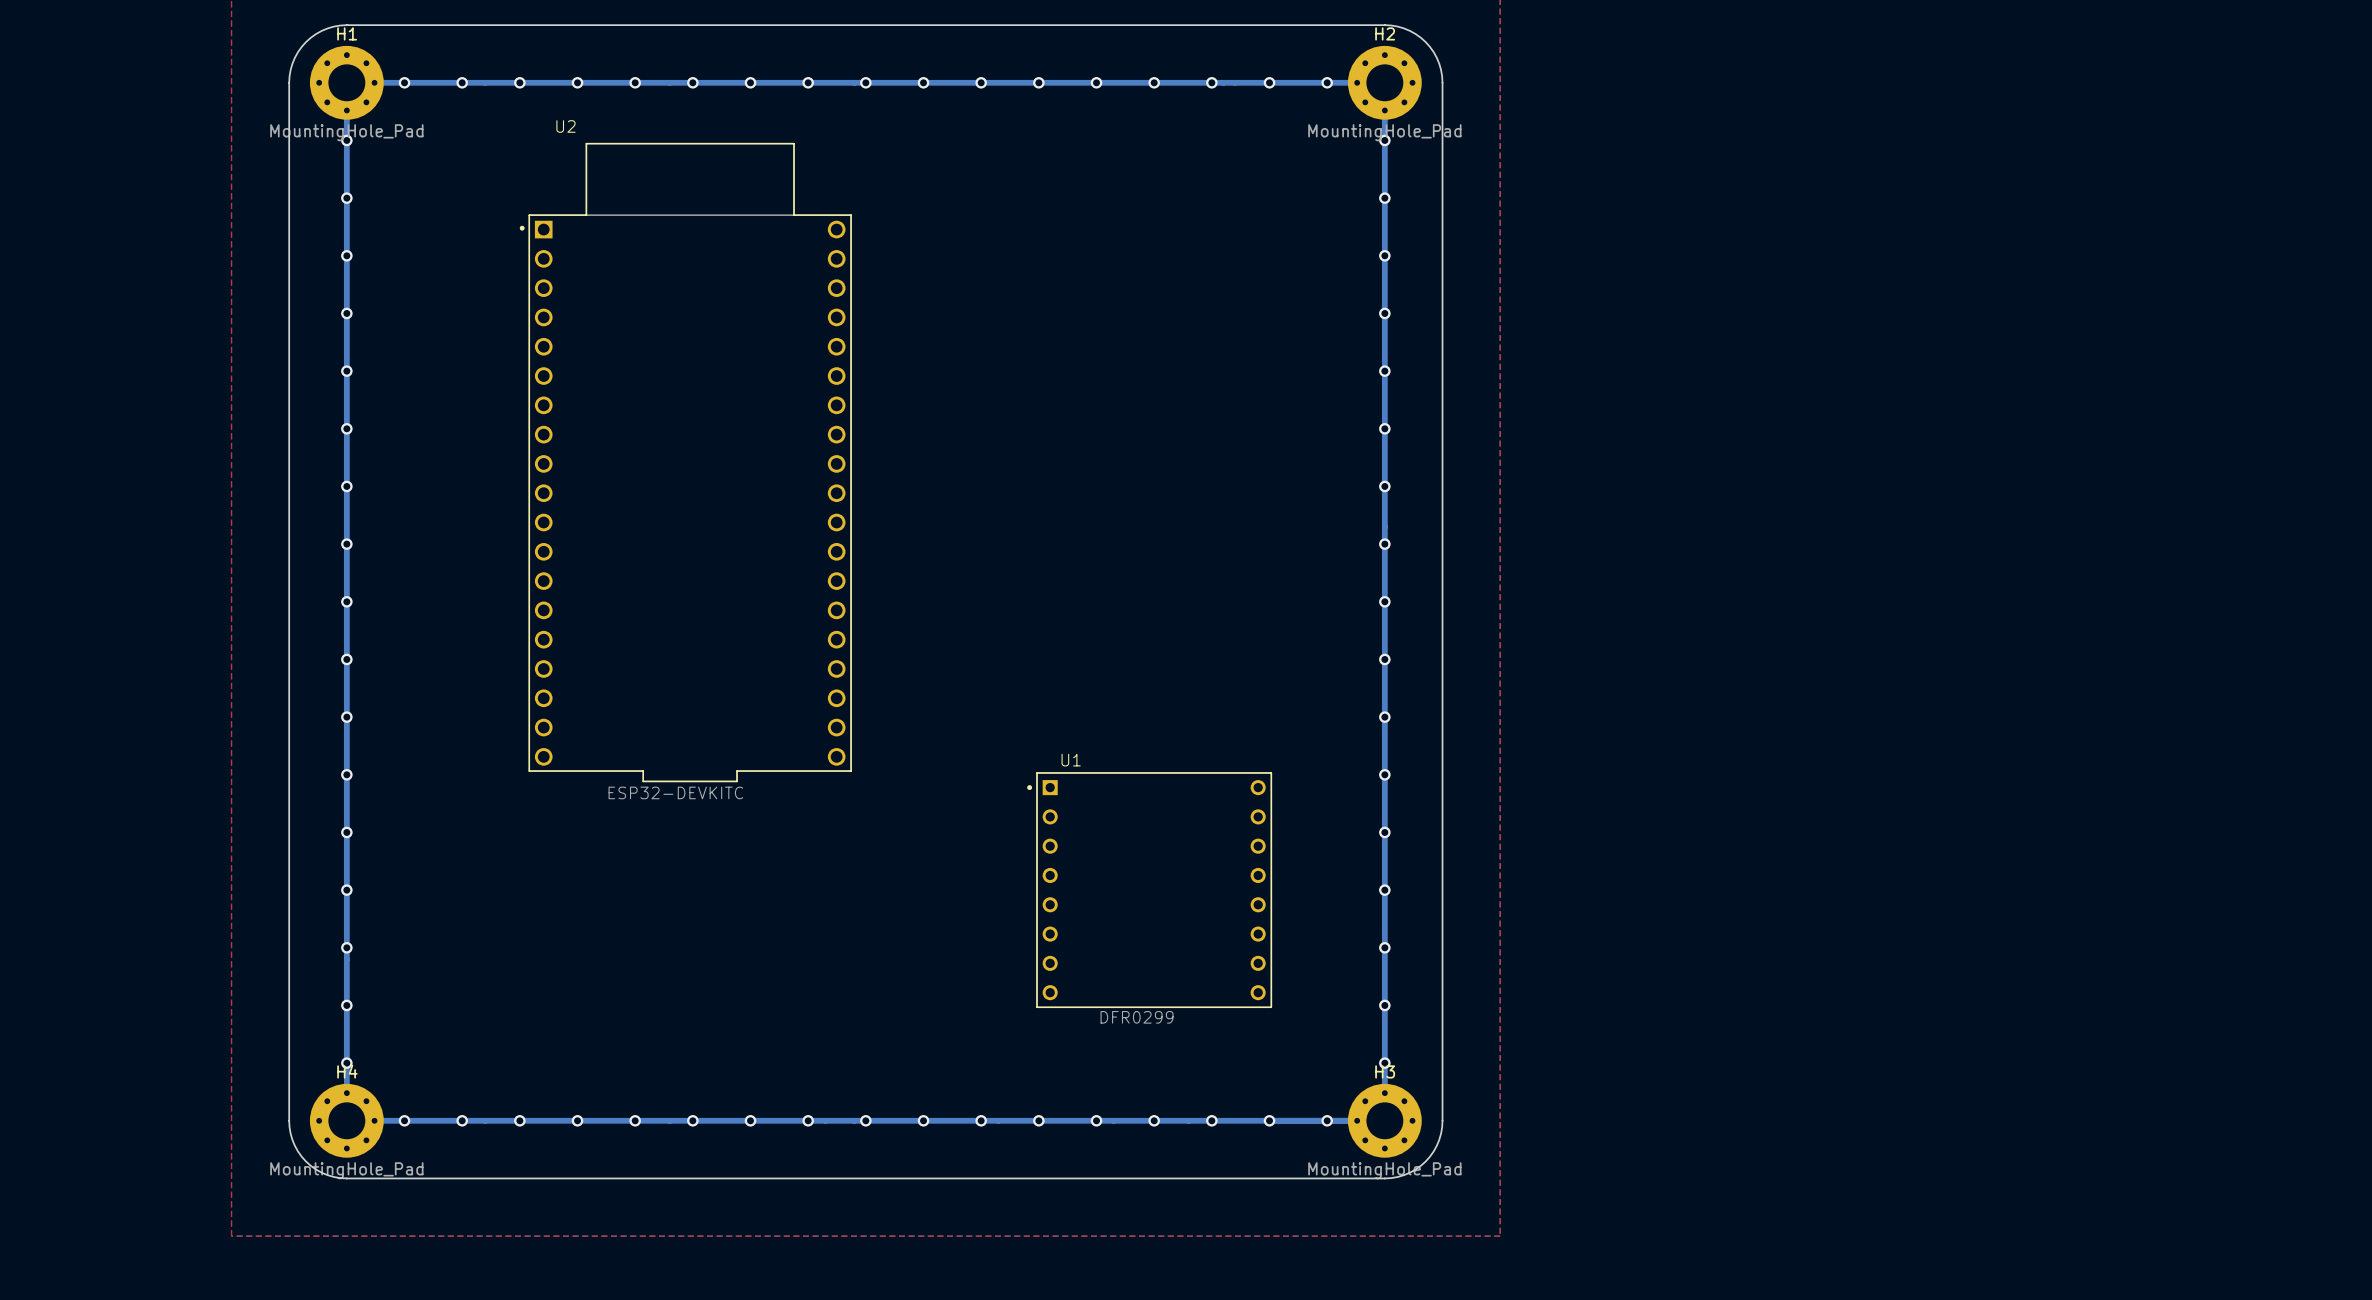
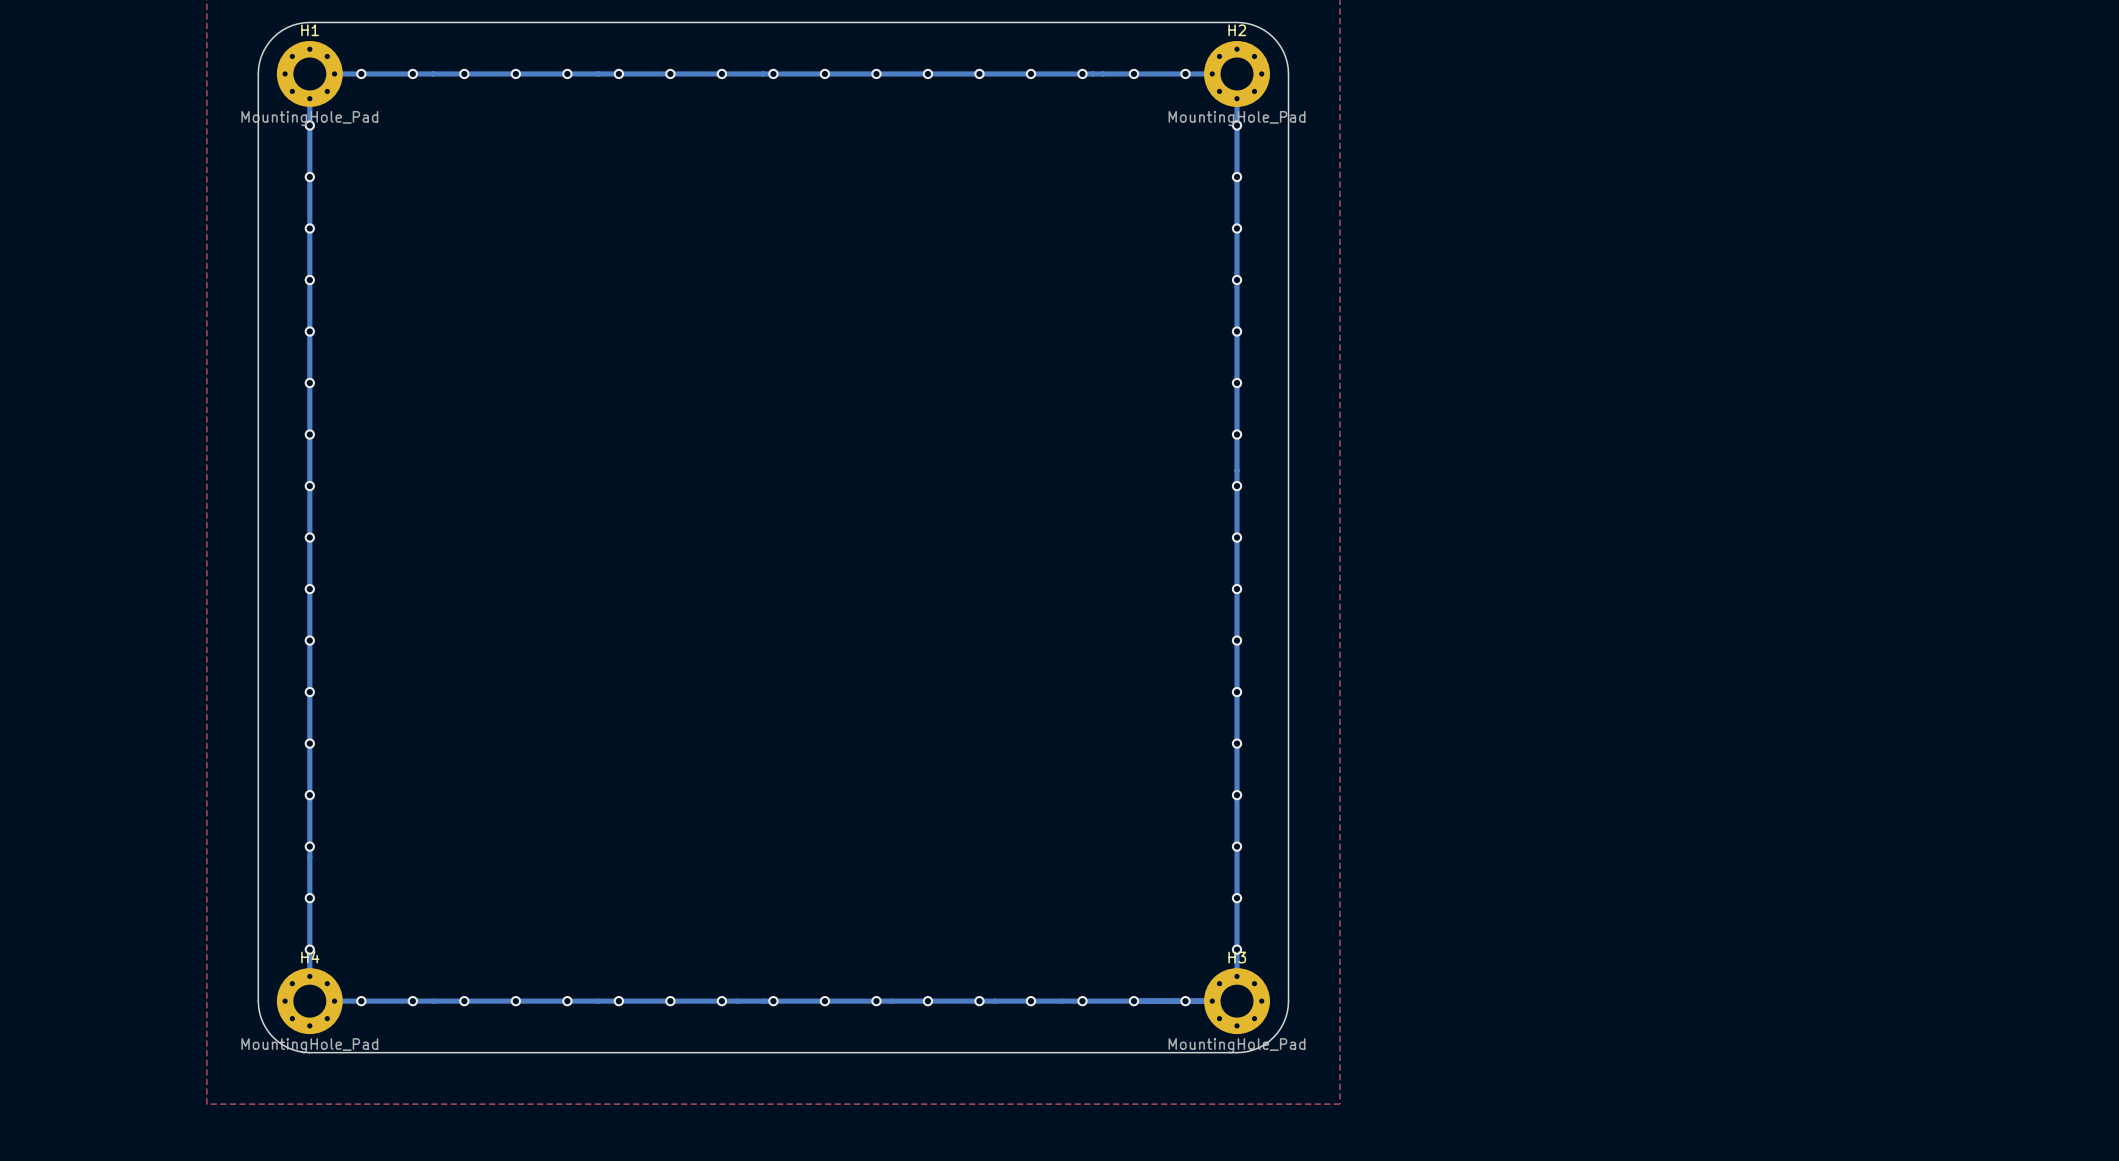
U2: ESP32-DEVKITC (685, 462) -> none
U1: DFR0299 (1149, 890) -> none

